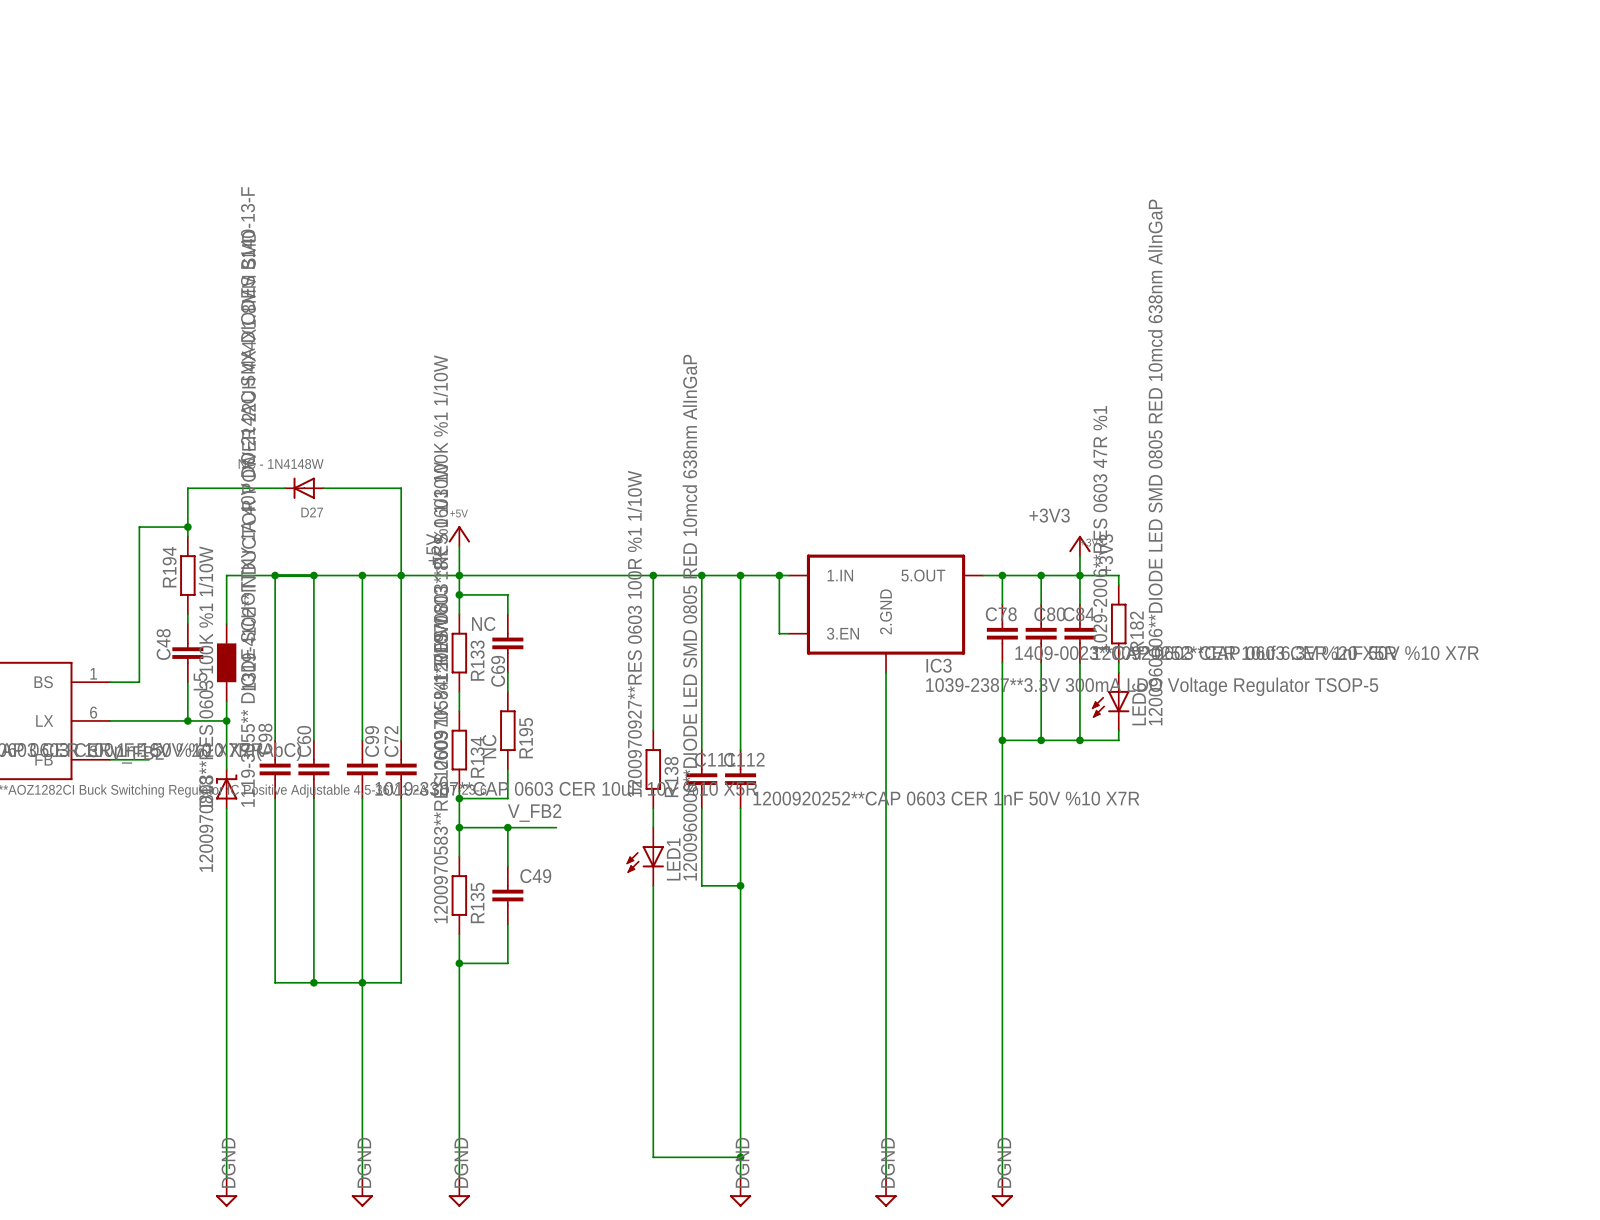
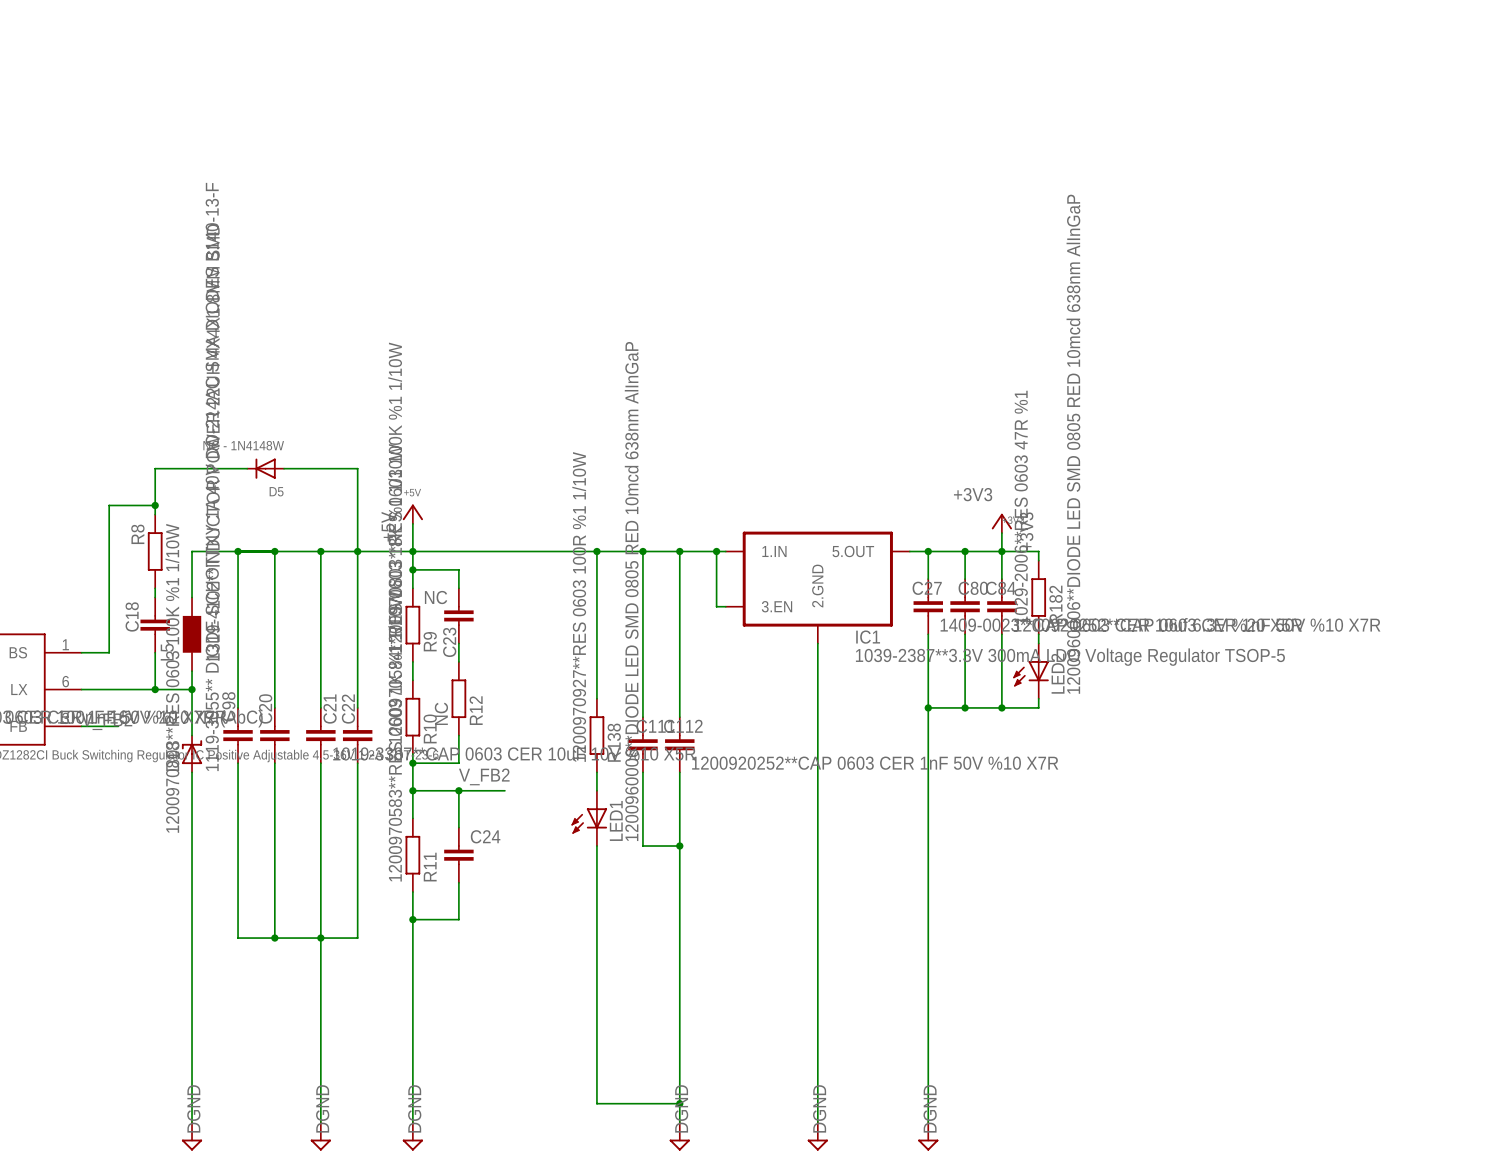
D27 name: D27 (312, 512) -> D5 (276, 491)
R194 name: R194 (169, 567) -> R8 (137, 534)
C78 name: C78 (1001, 614) -> C27 (927, 588)
C48 name: C48 (163, 644) -> C18 (132, 616)
R133 name: R133 (477, 660) -> R9 (430, 641)
IC3 name: IC3 (939, 665) -> IC1 (868, 637)
C69 name: C69 (498, 671) -> C23 (449, 642)
LED6 name: LED6 (1139, 704) -> LED2 (1057, 673)
R195 name: R195 (526, 738) -> R12 (476, 710)
C60 name: C60 (304, 741) -> C20 (265, 708)
C99 name: C99 (372, 741) -> C21 (330, 709)
C72 name: C72 (391, 741) -> C22 (348, 709)
R134 name: R134 (477, 757) -> R10 (430, 728)
C49 name: C49 (535, 876) -> C24 (485, 836)
R135 name: R135 (477, 903) -> R11 (430, 867)

